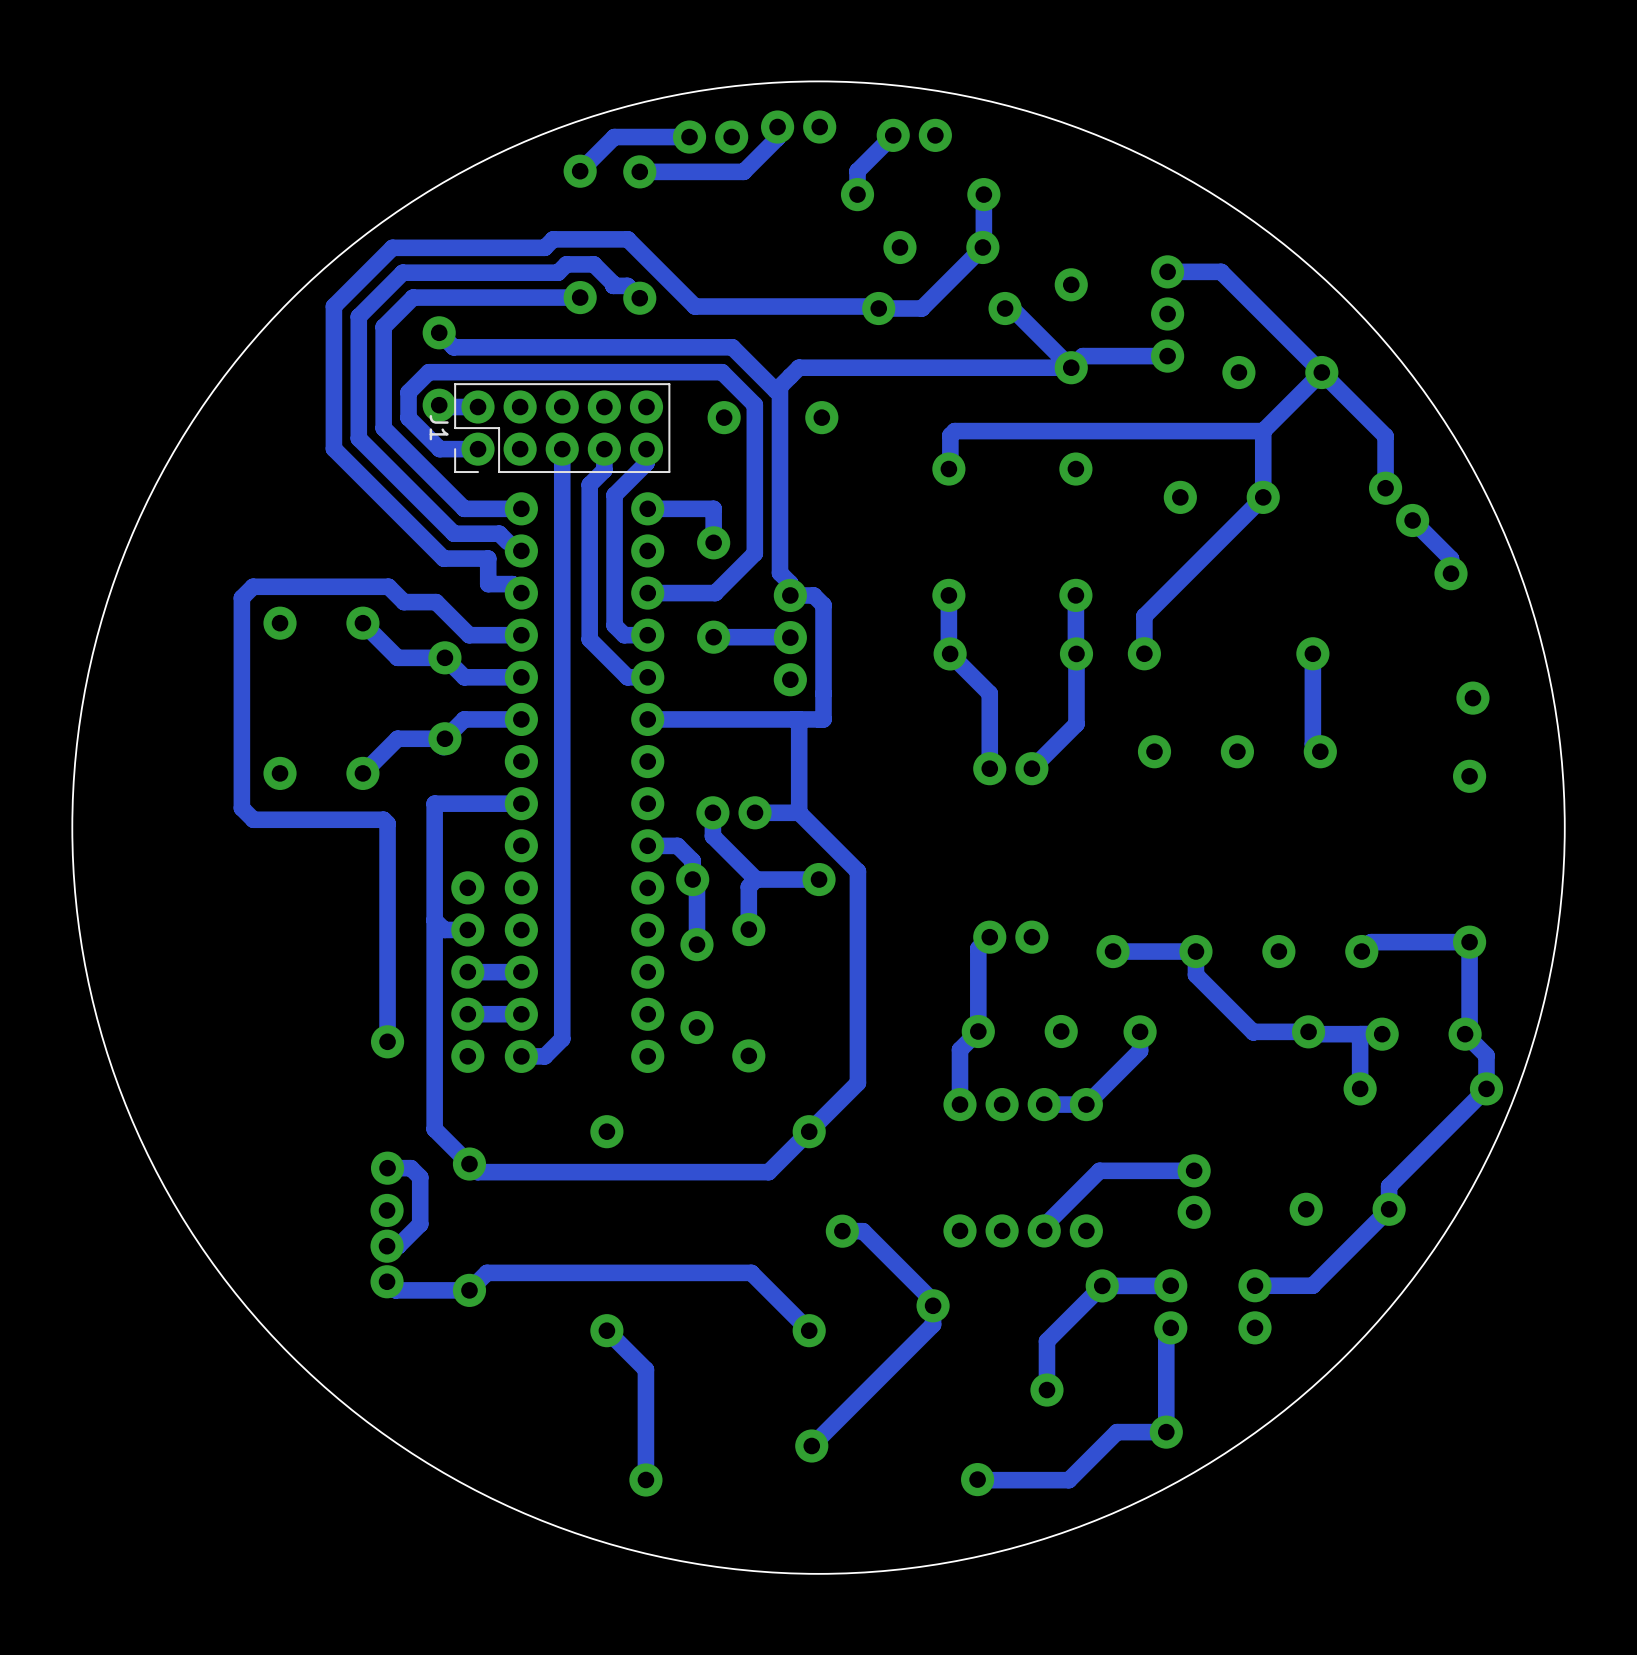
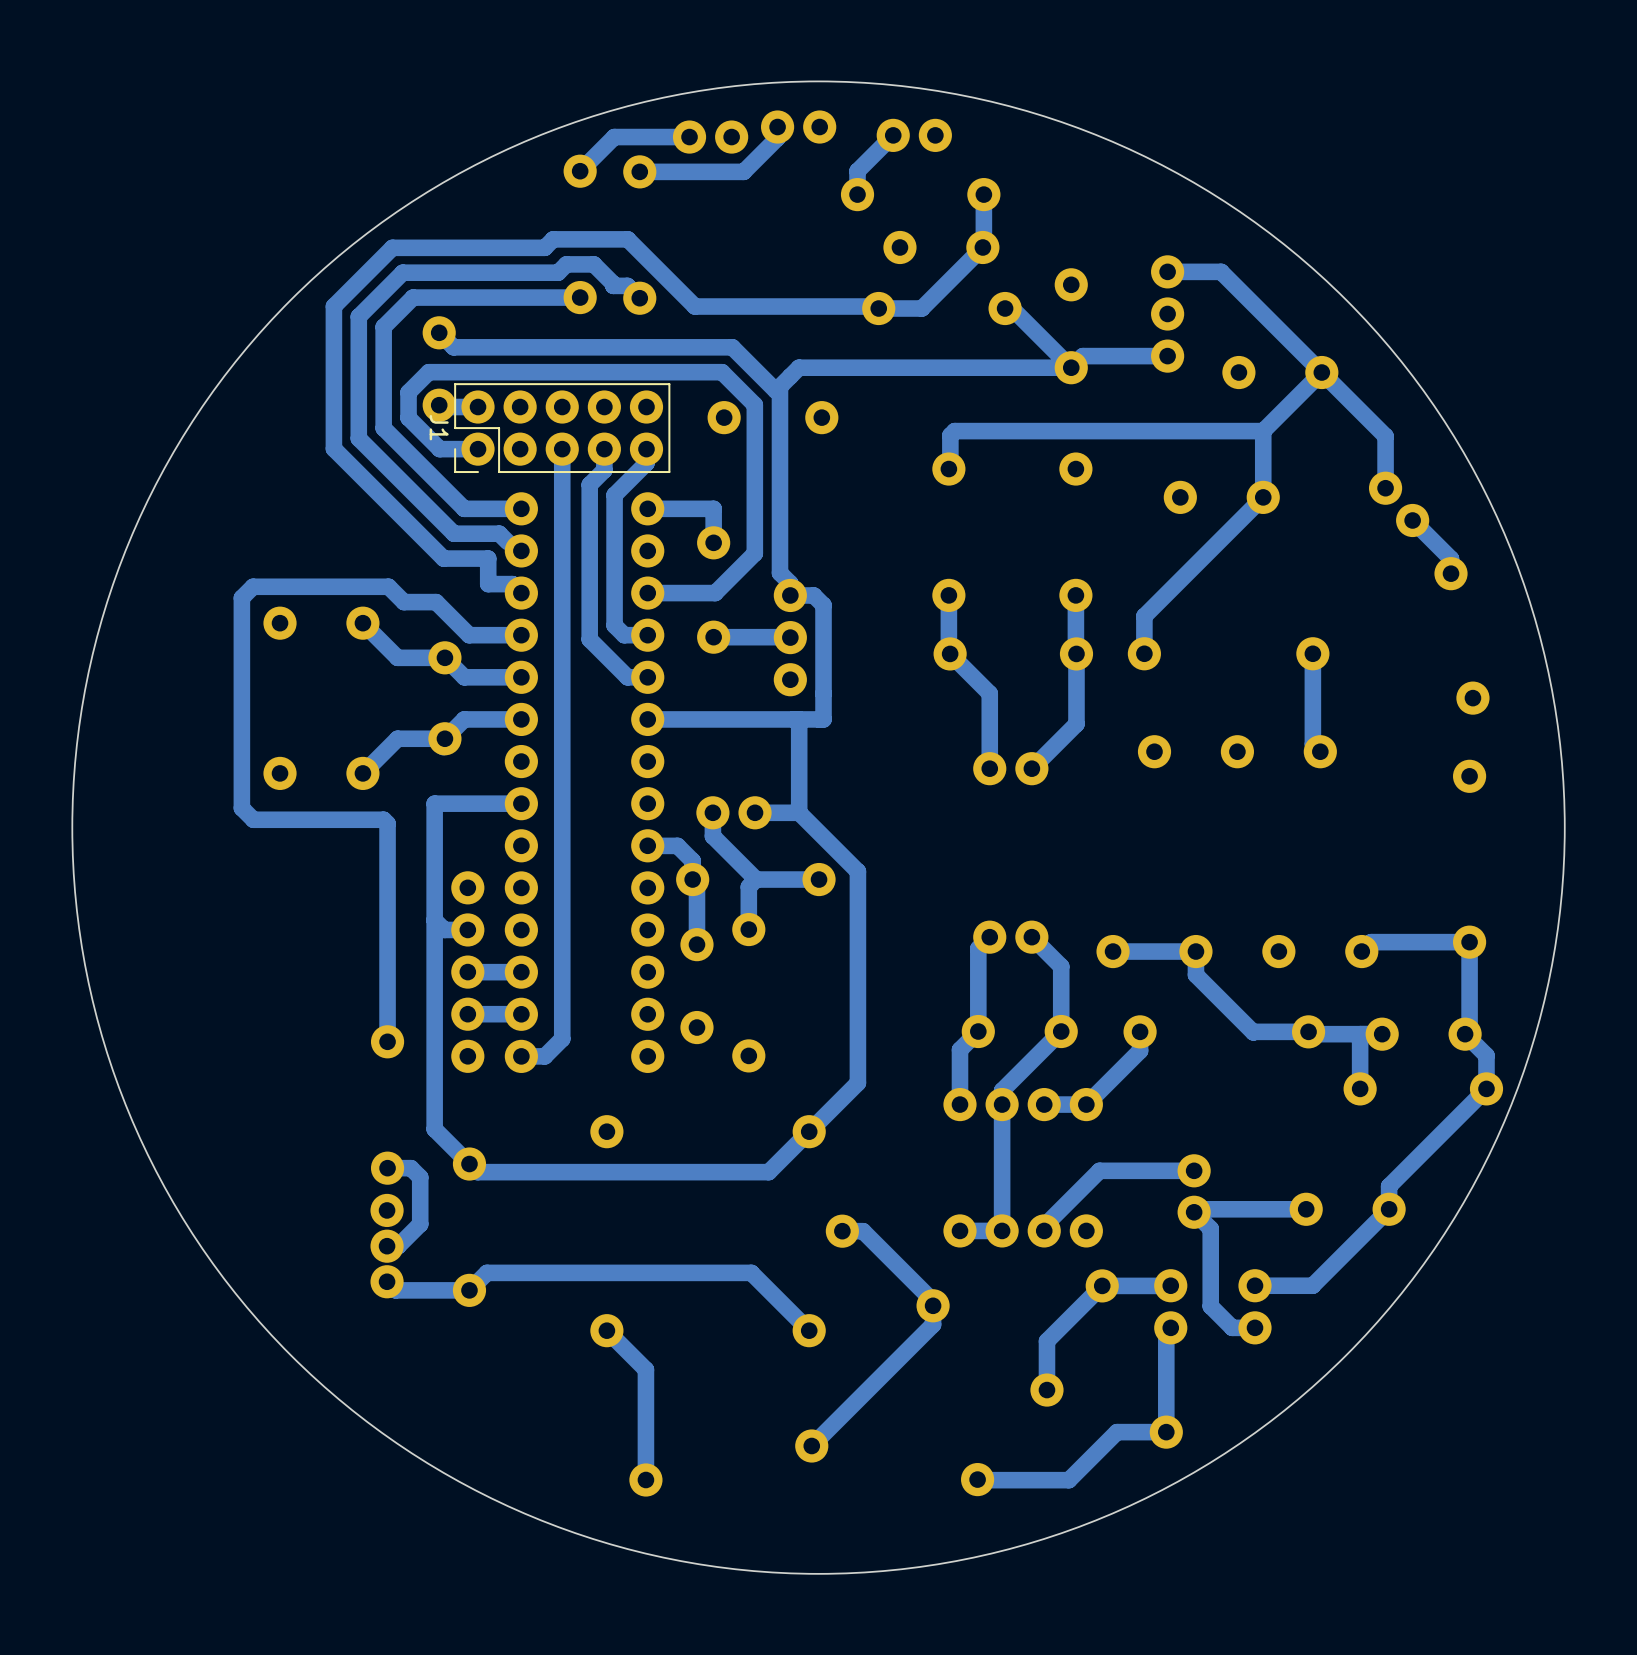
track: none -> (1031, 937) (1061, 966) (1061, 1031) (1002, 1090) (1002, 1230) (959, 1230)
track: none -> (1306, 1209) (1197, 1209) (1194, 1212) (1210, 1228) (1210, 1306) (1232, 1327) (1255, 1327)

